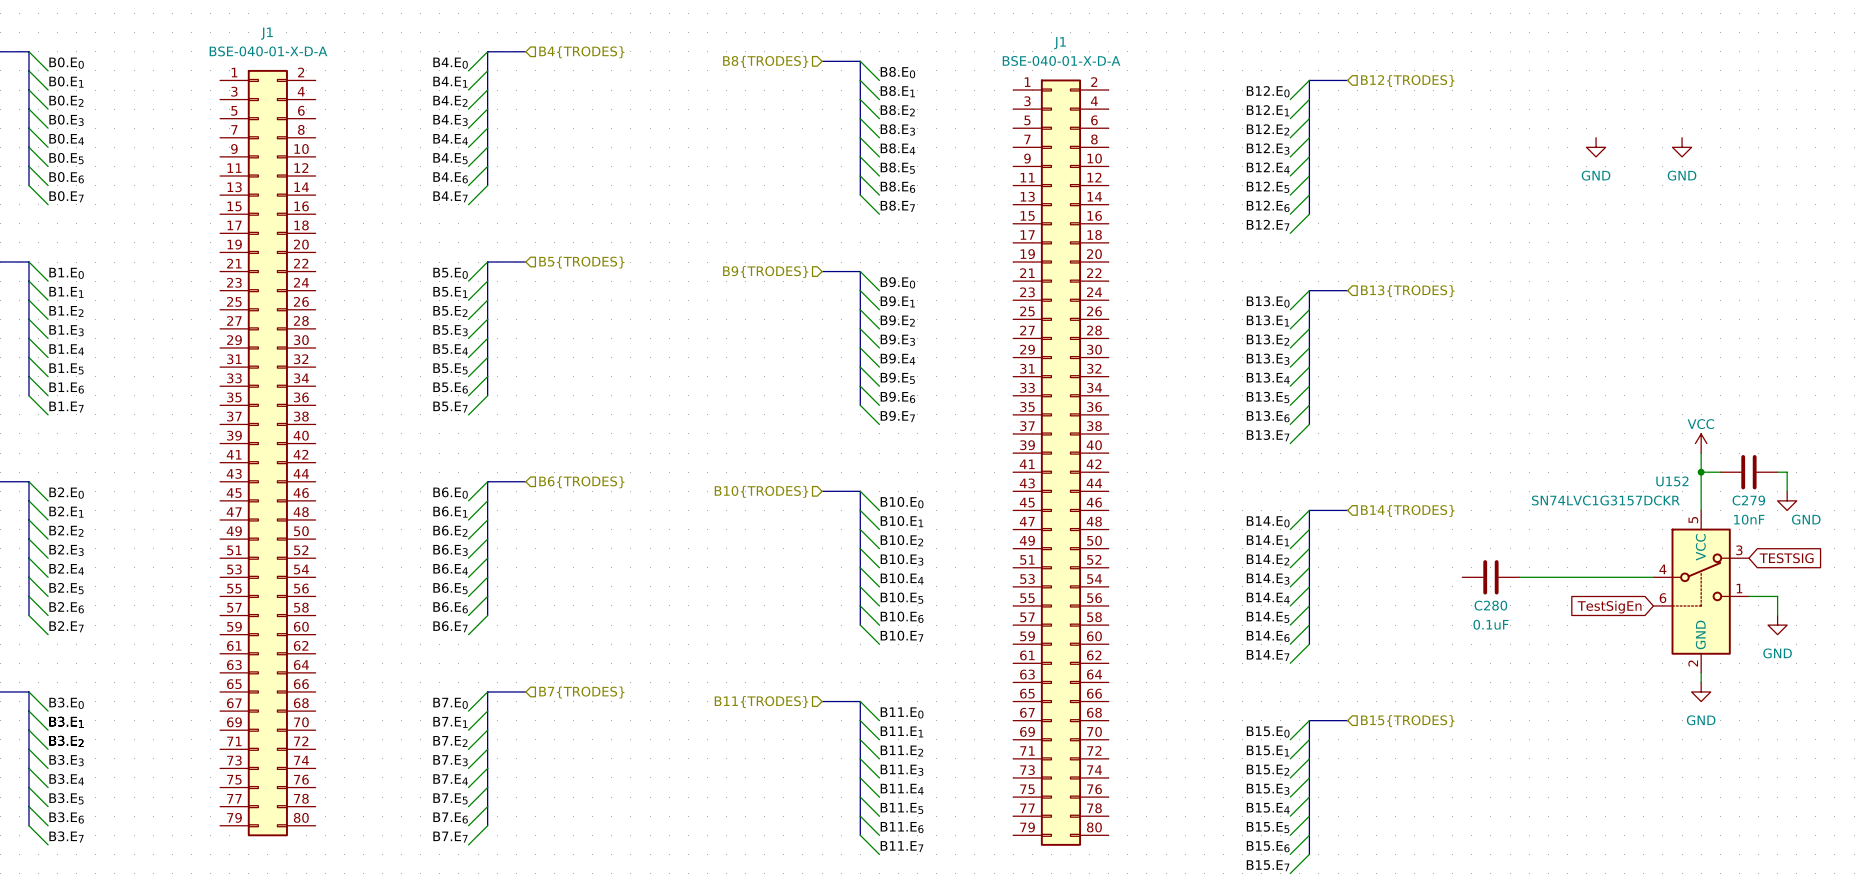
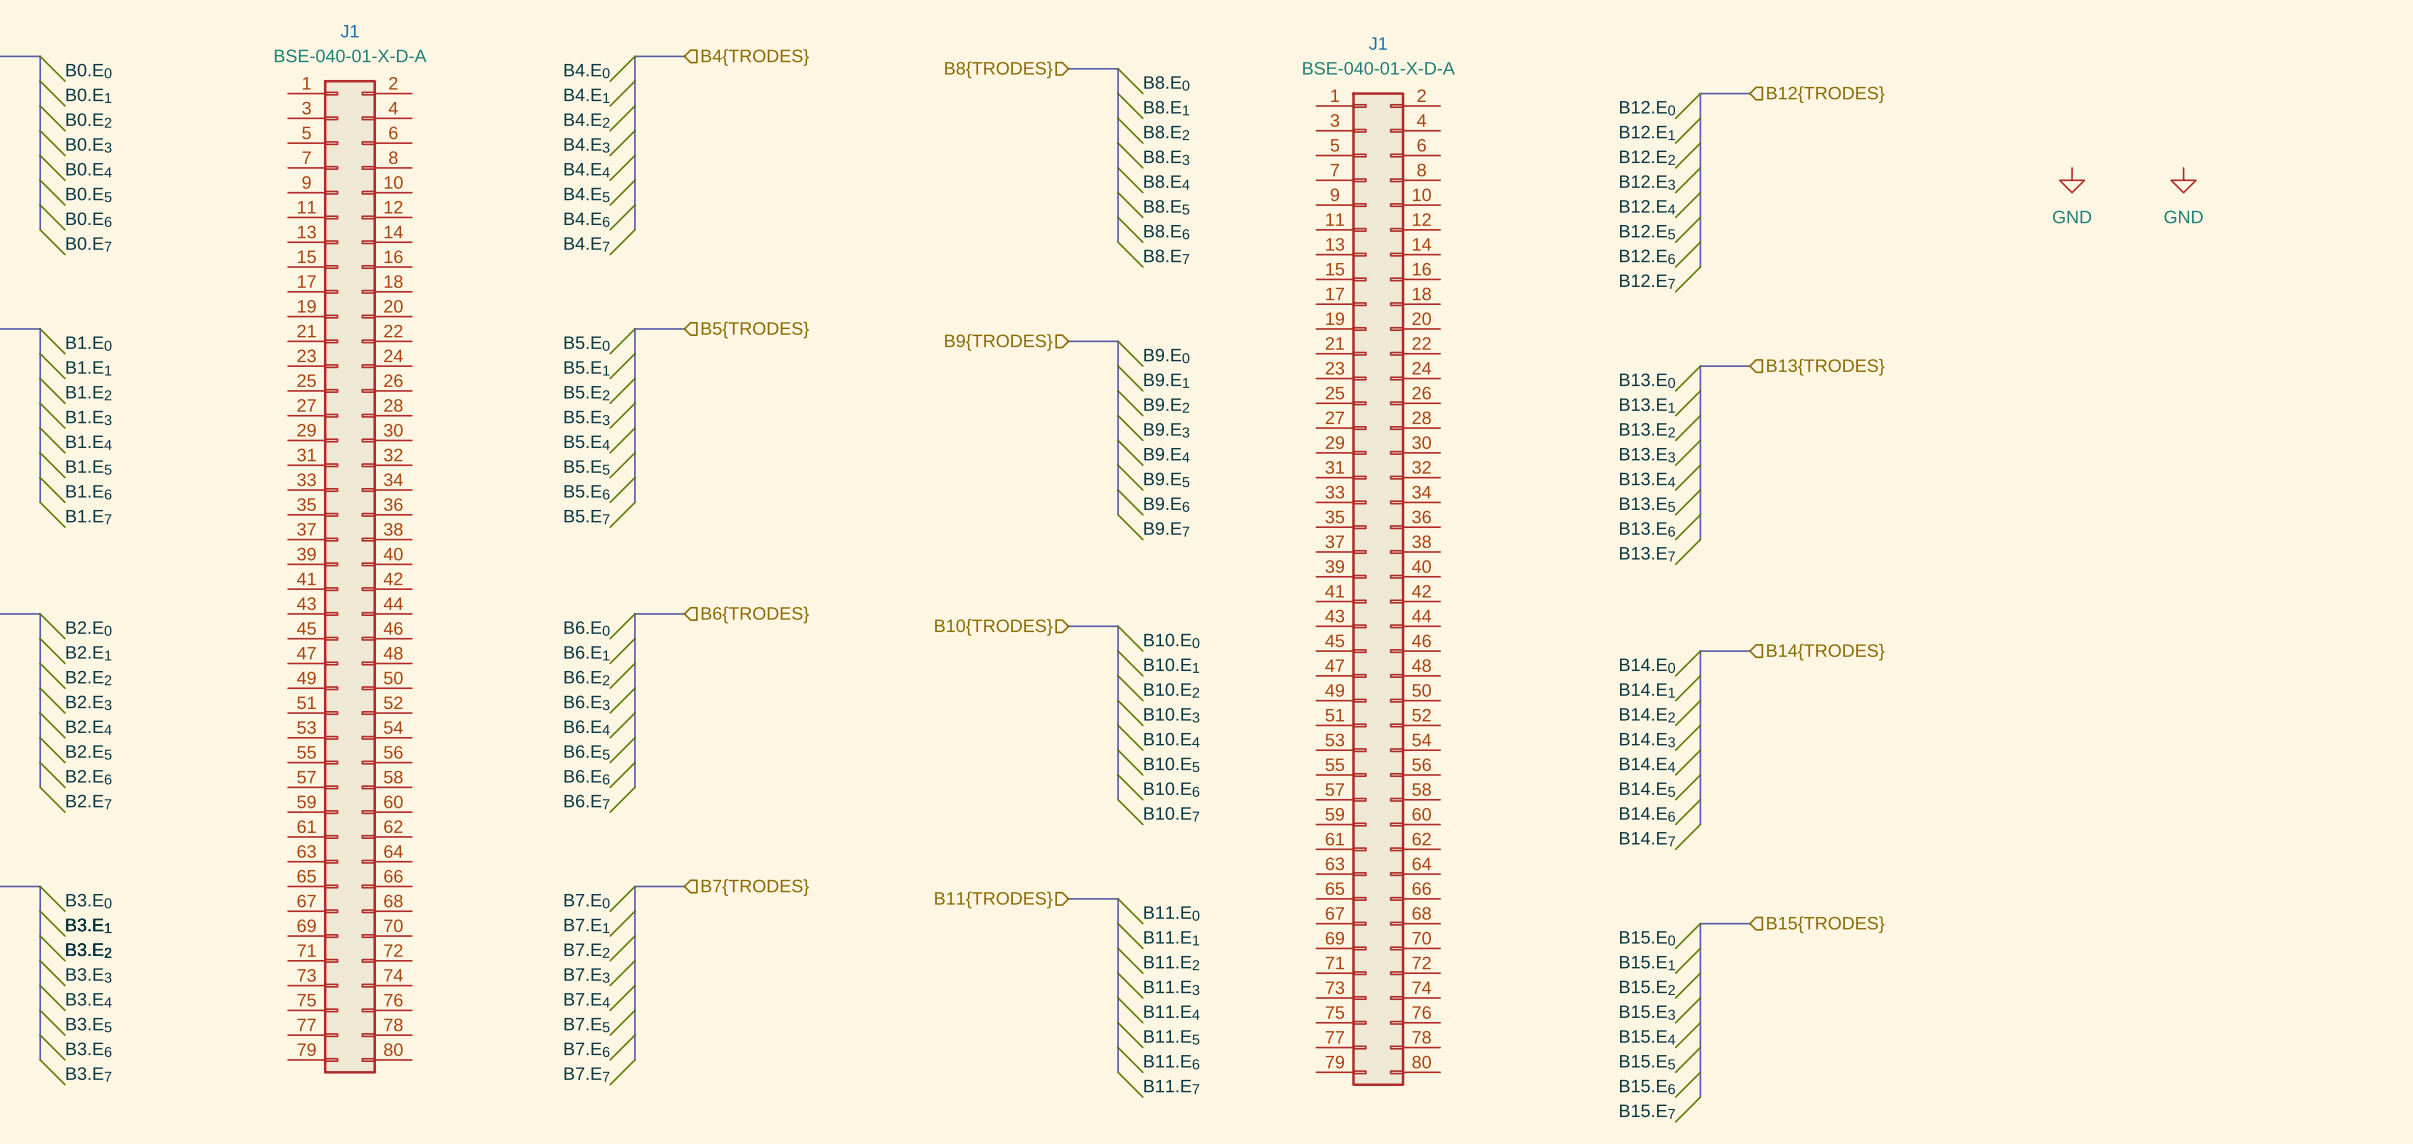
power symbol: VCC (1701, 443) -> none
wire: (1701, 453) (1701, 510) -> none
wire: (1701, 472) (1720, 472) -> none
junction: (1701, 472) -> none
C279: 10nF (1748, 472) -> none
wire: (1777, 472) (1787, 472) (1787, 491) -> none
power symbol: GND (1787, 500) -> none
global label: TESTSIG (1786, 558) -> none
C280: 0.1uF (1490, 577) -> none
wire: (1519, 577) (1653, 577) -> none
U152: SN74LVC1G3157DCKR (1701, 591) -> none
wire: (1748, 596) (1777, 596) (1777, 615) -> none
global label: TestSigEn (1609, 607) -> none
power symbol: GND (1777, 625) -> none
wire: (1701, 672) (1701, 682) -> none
power symbol: GND (1701, 691) -> none

